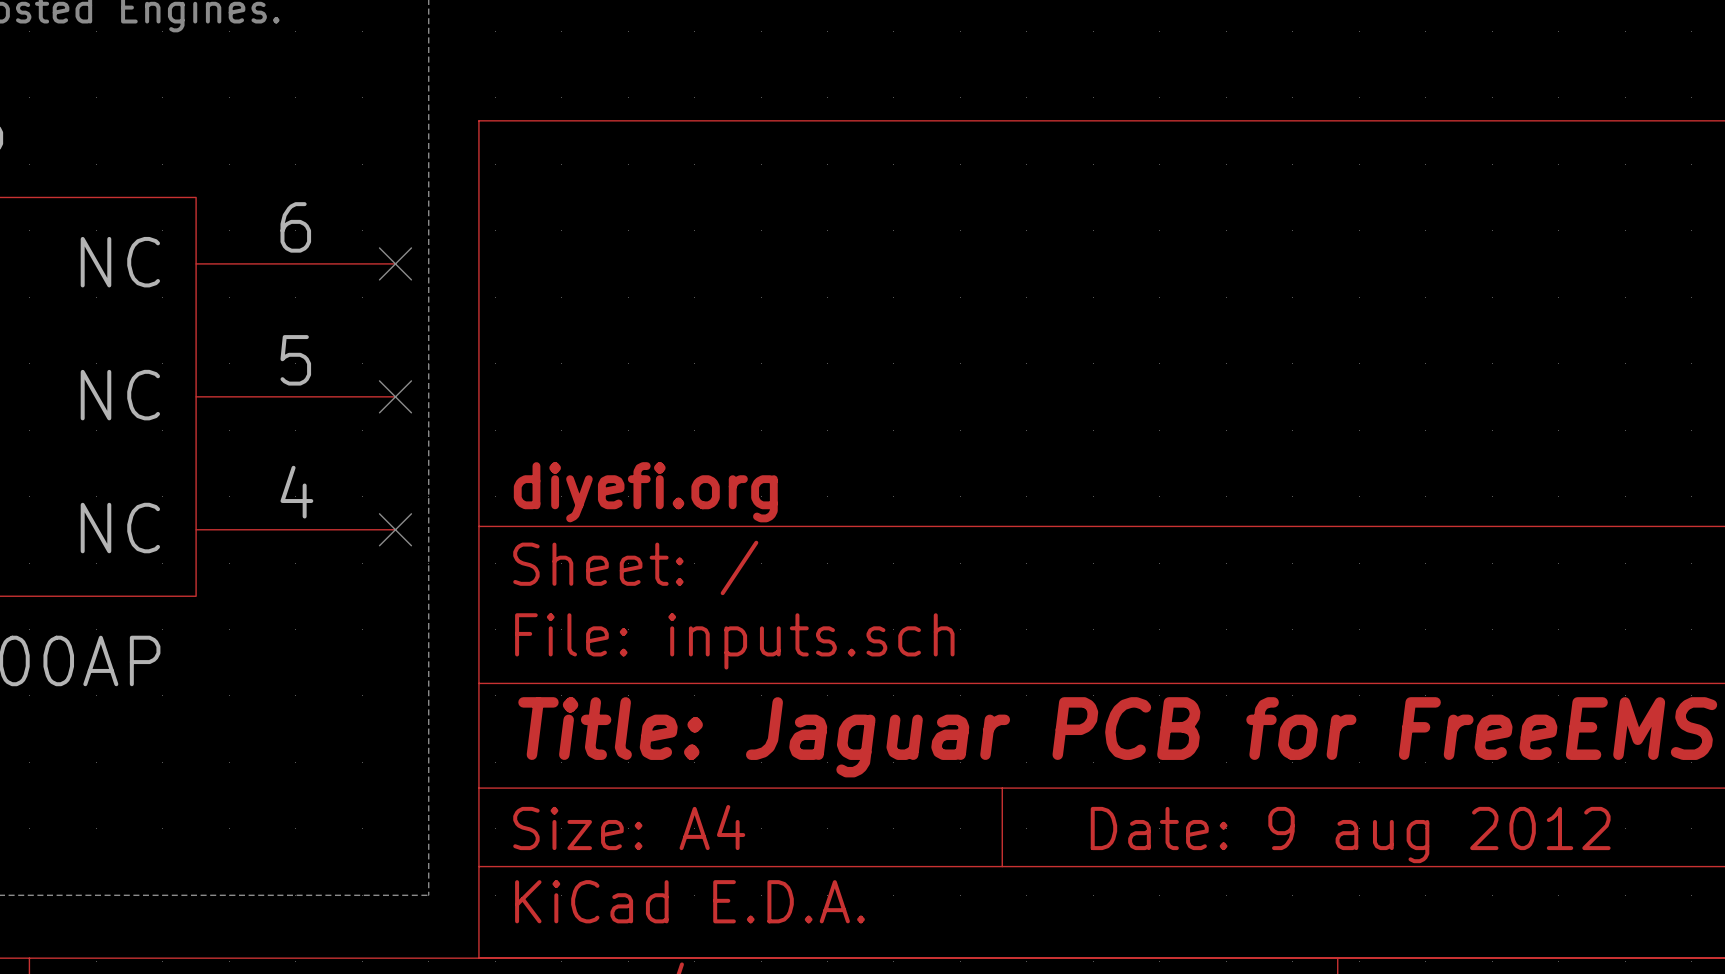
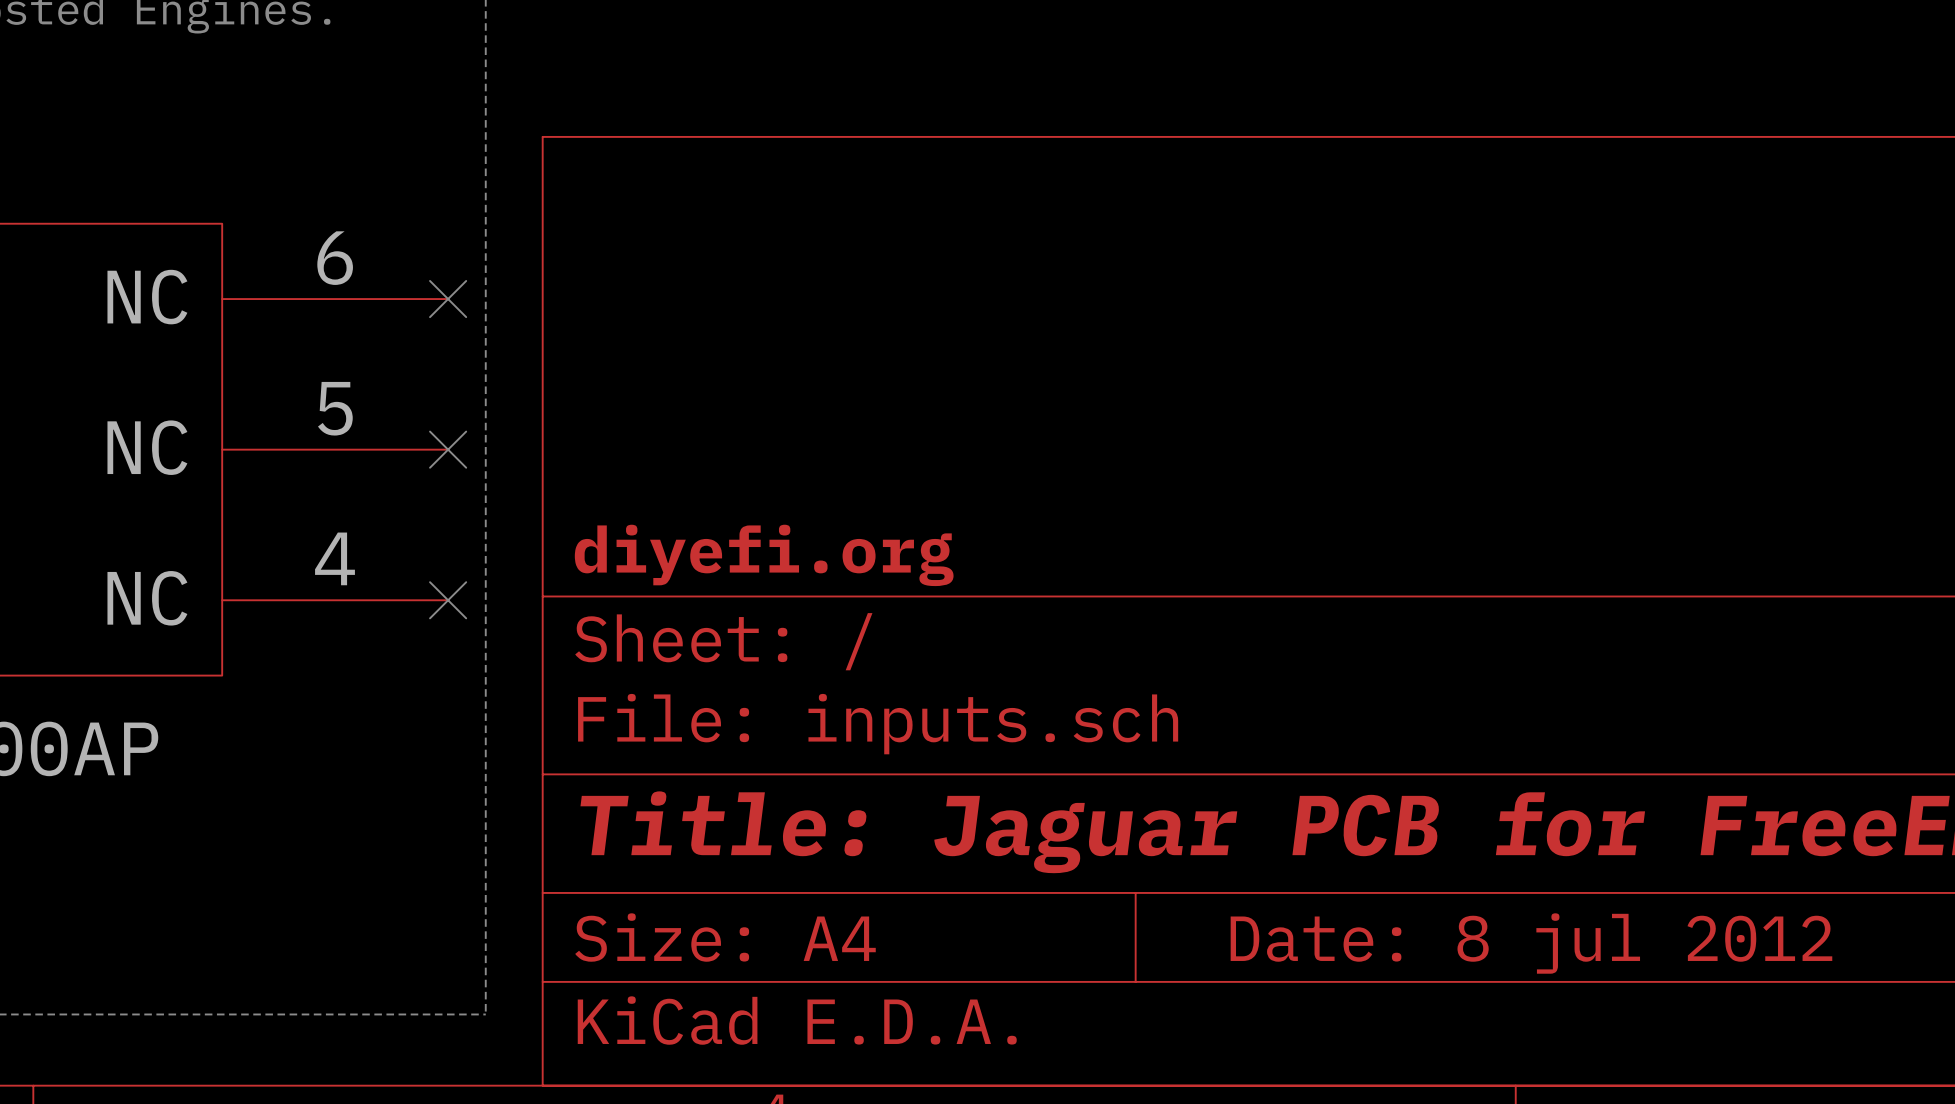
title block: Date: 9 aug 2012 (1350, 835) -> Date: 8 jul 2012 (1531, 943)

